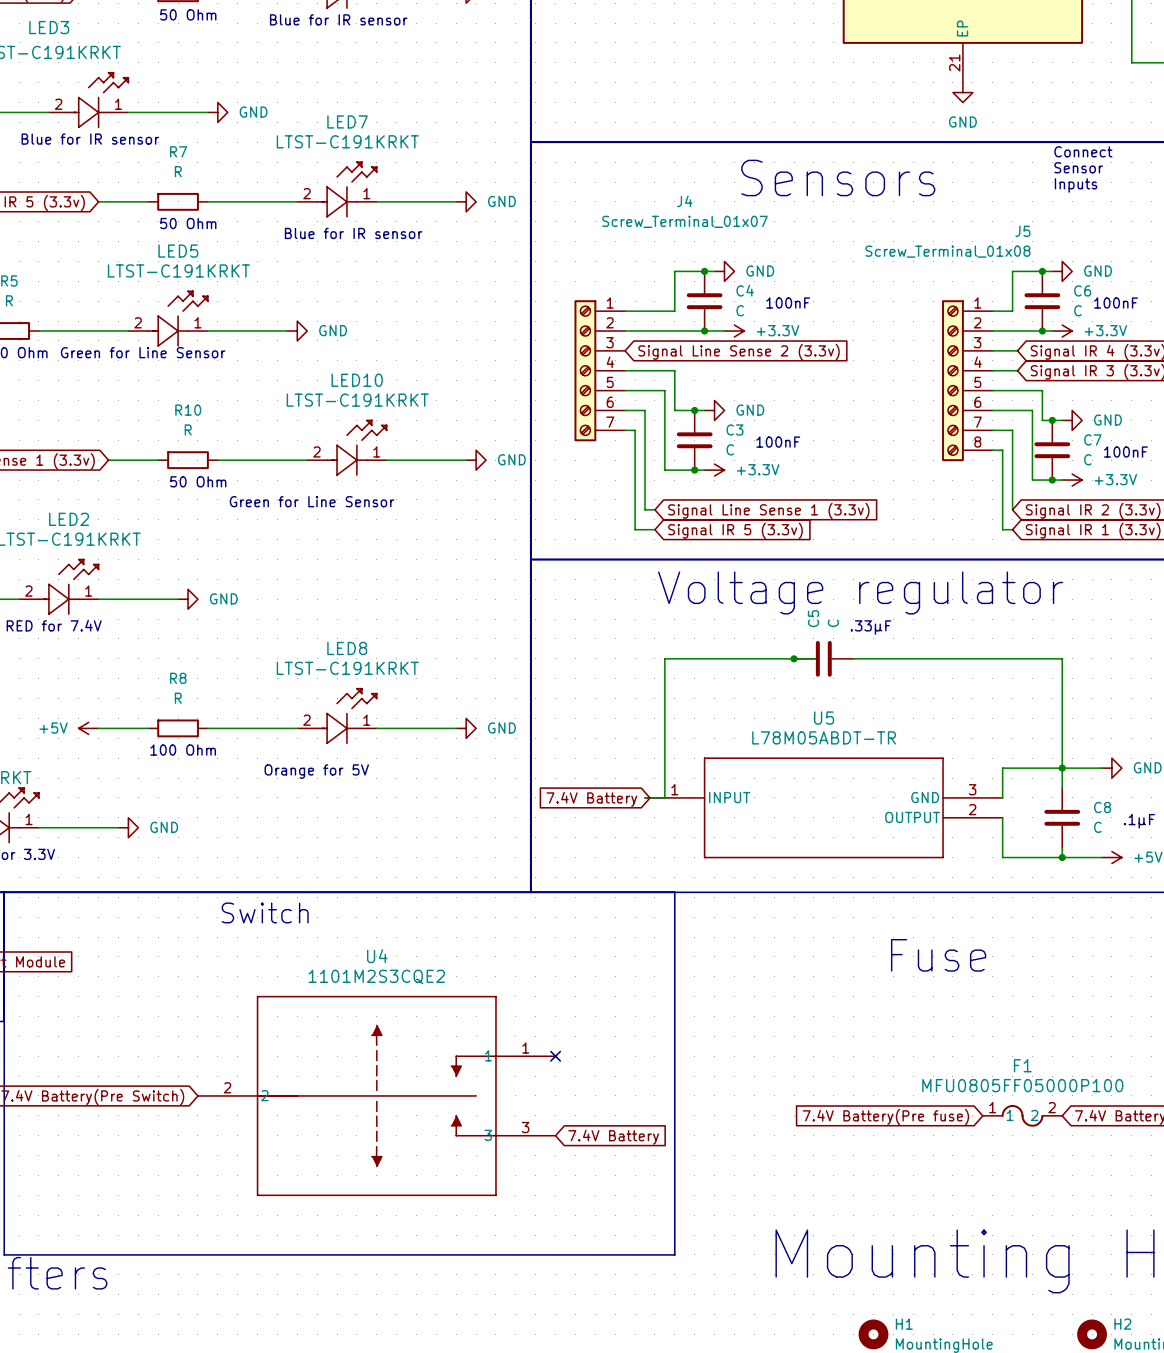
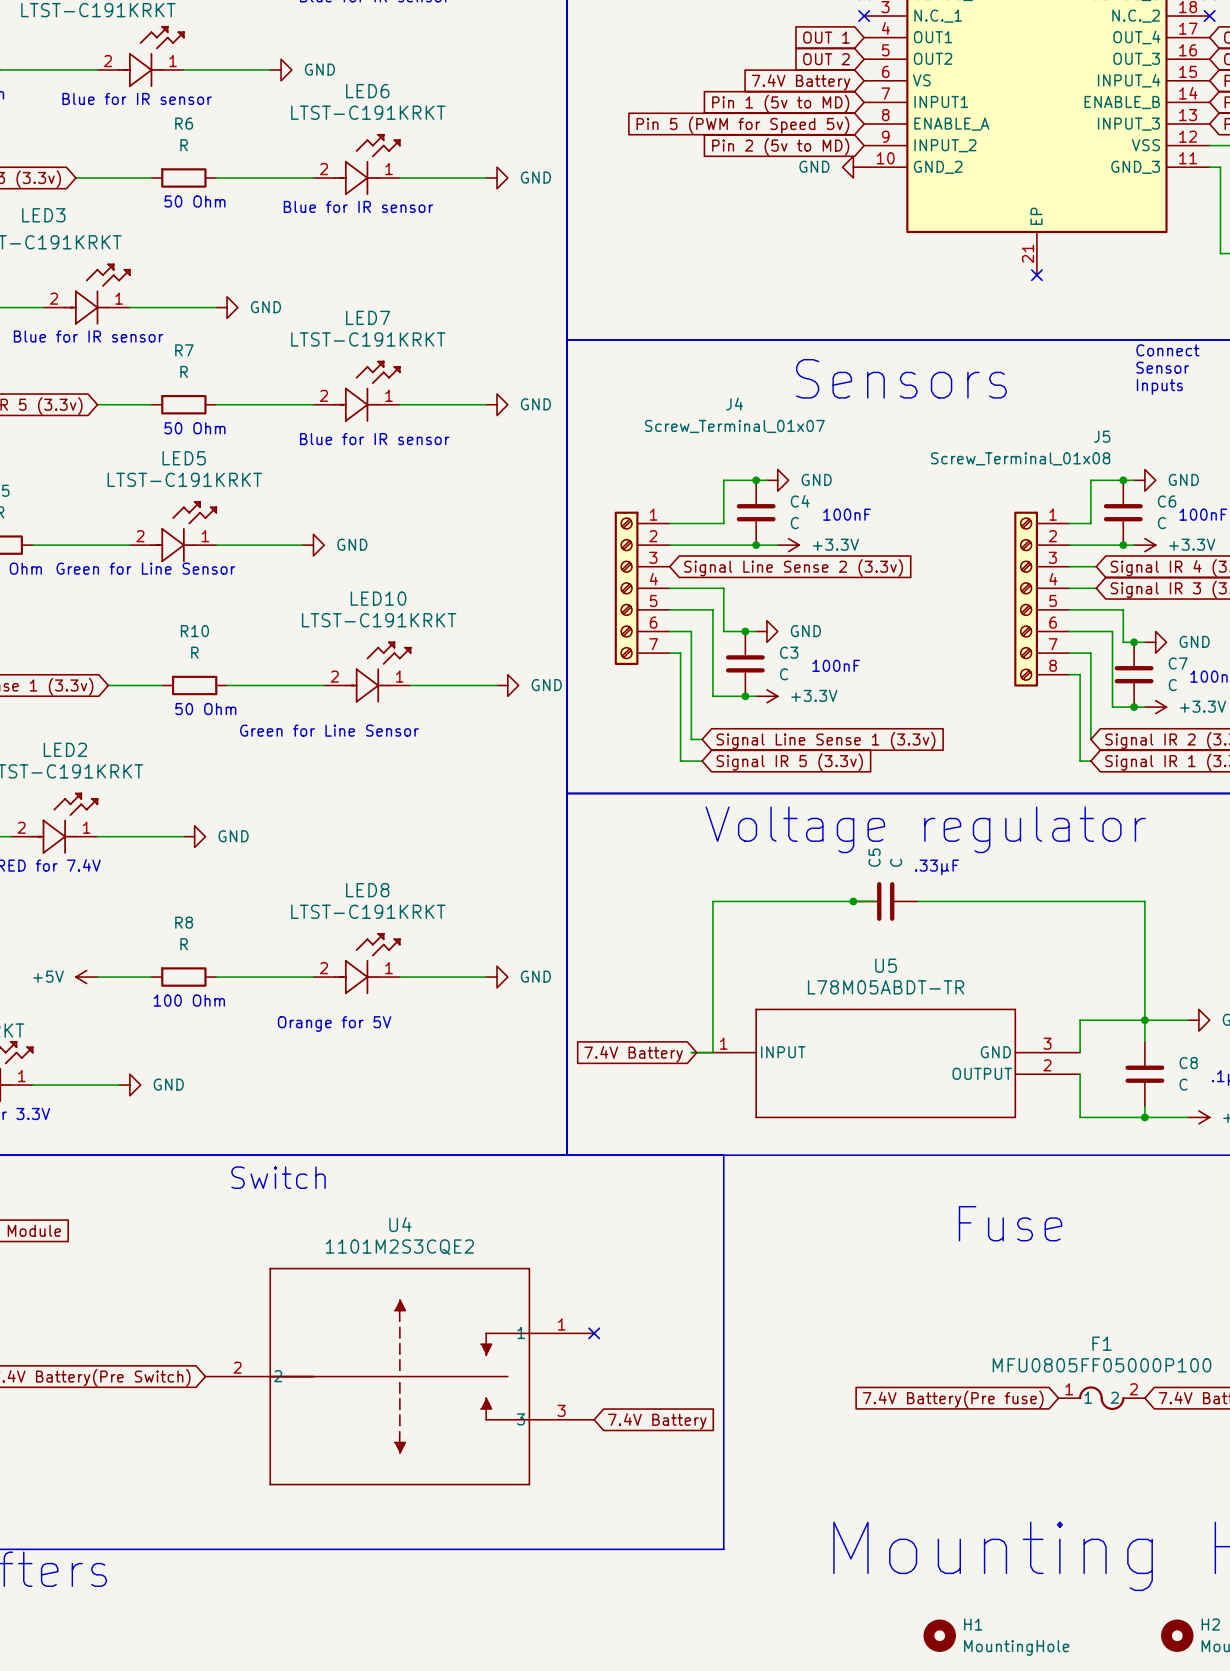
no-connect mark: none -> (1036, 275)
power symbol: GND (962, 92) -> none

